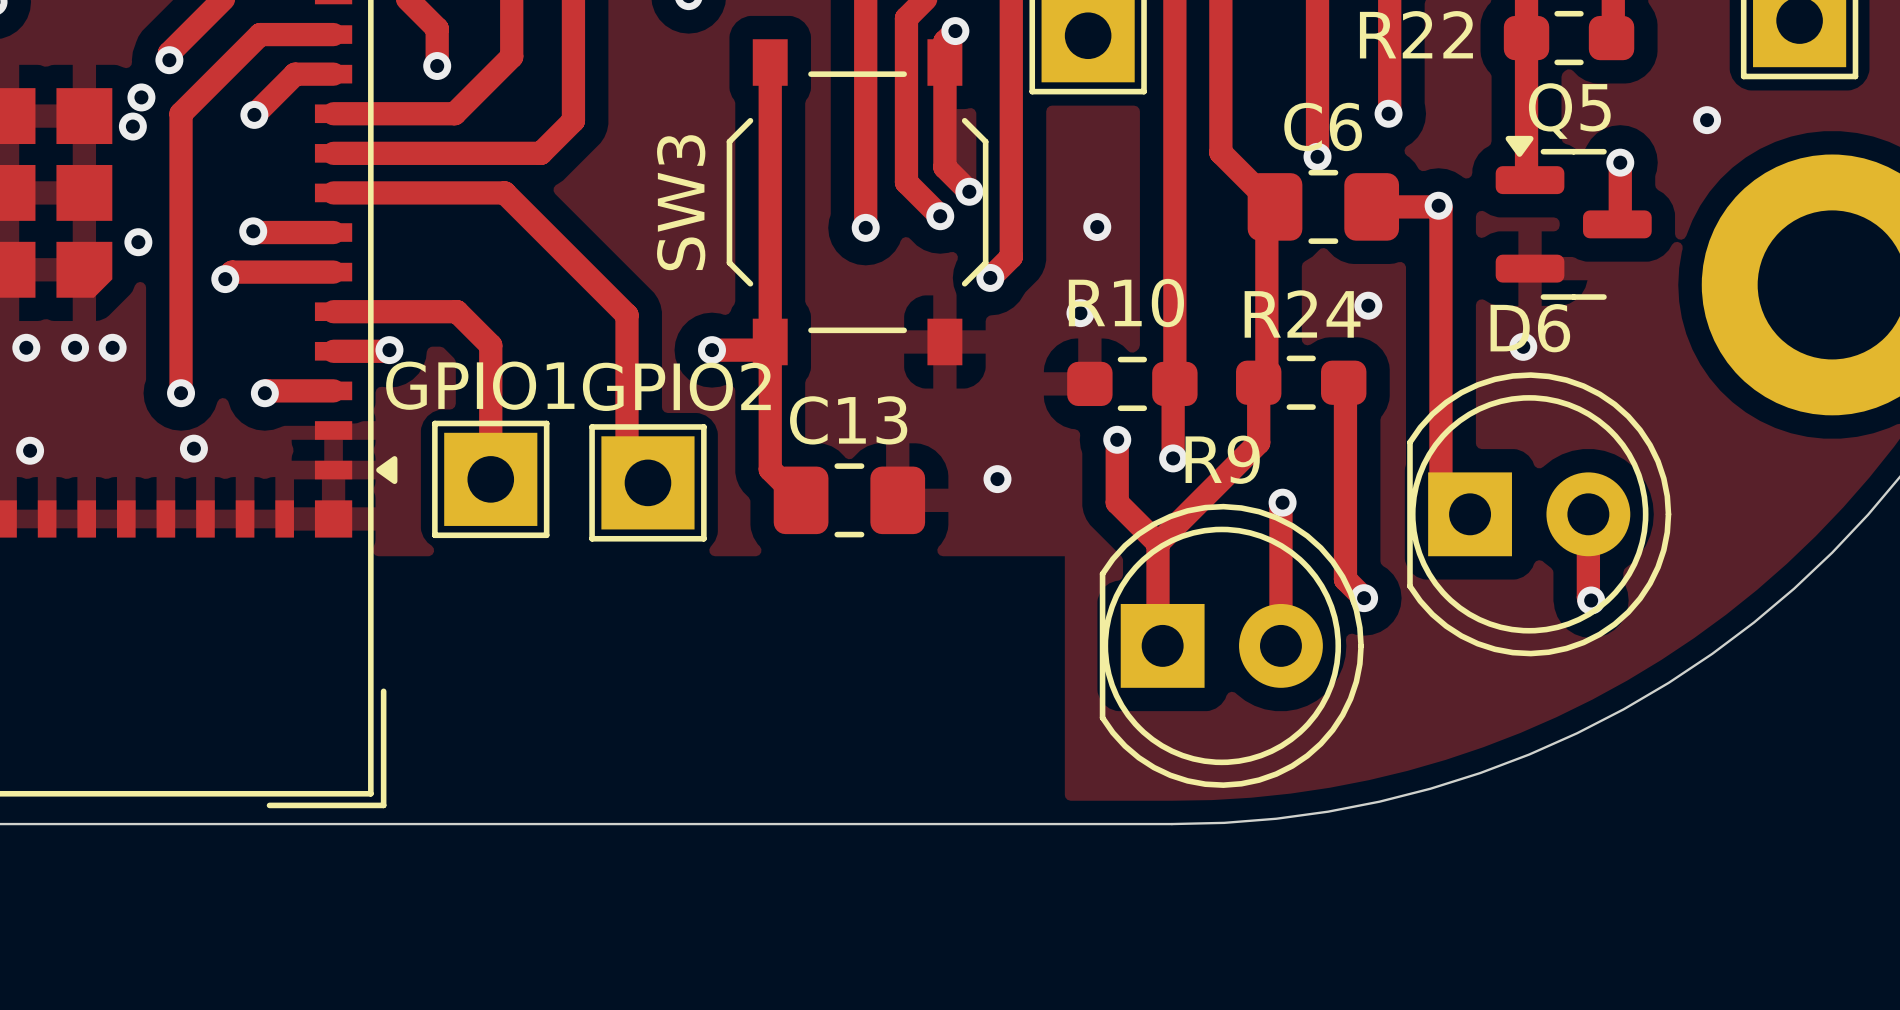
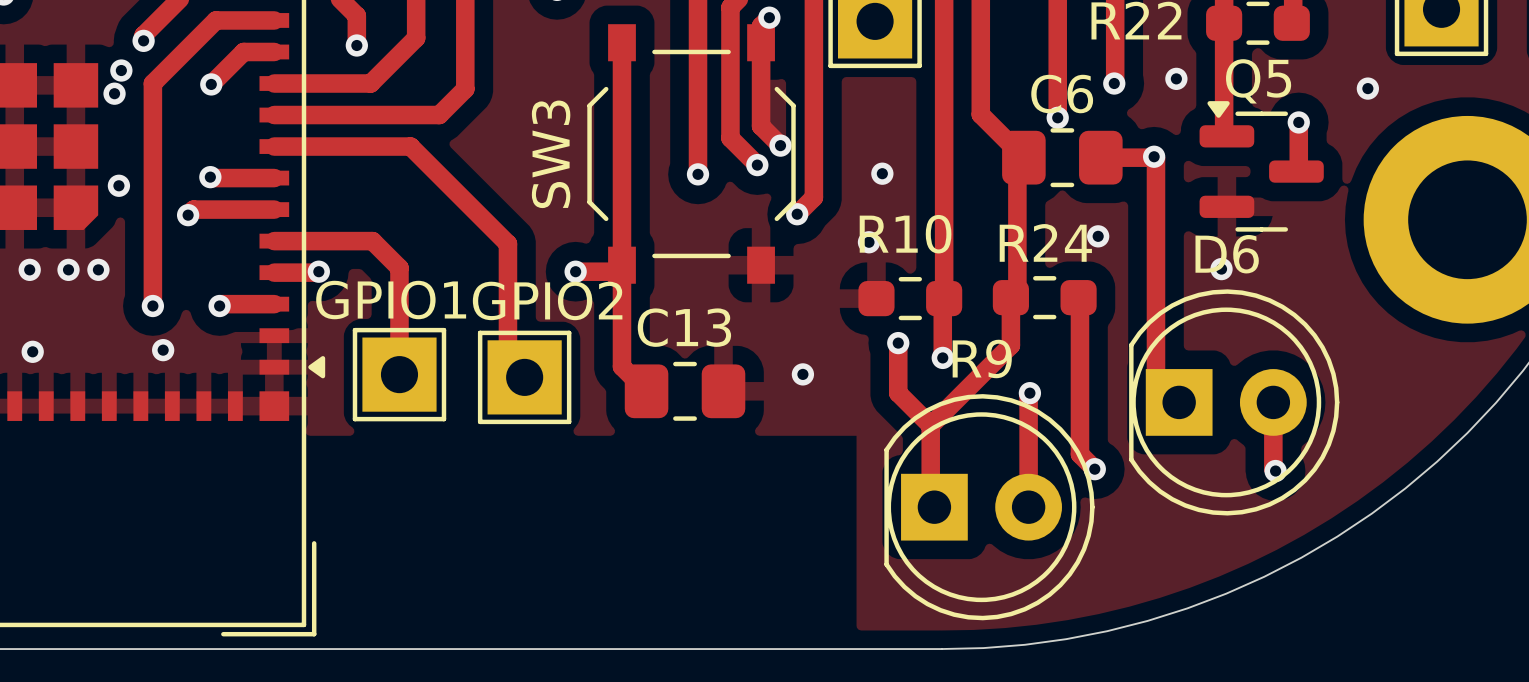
via: none -> (1176, 78)

